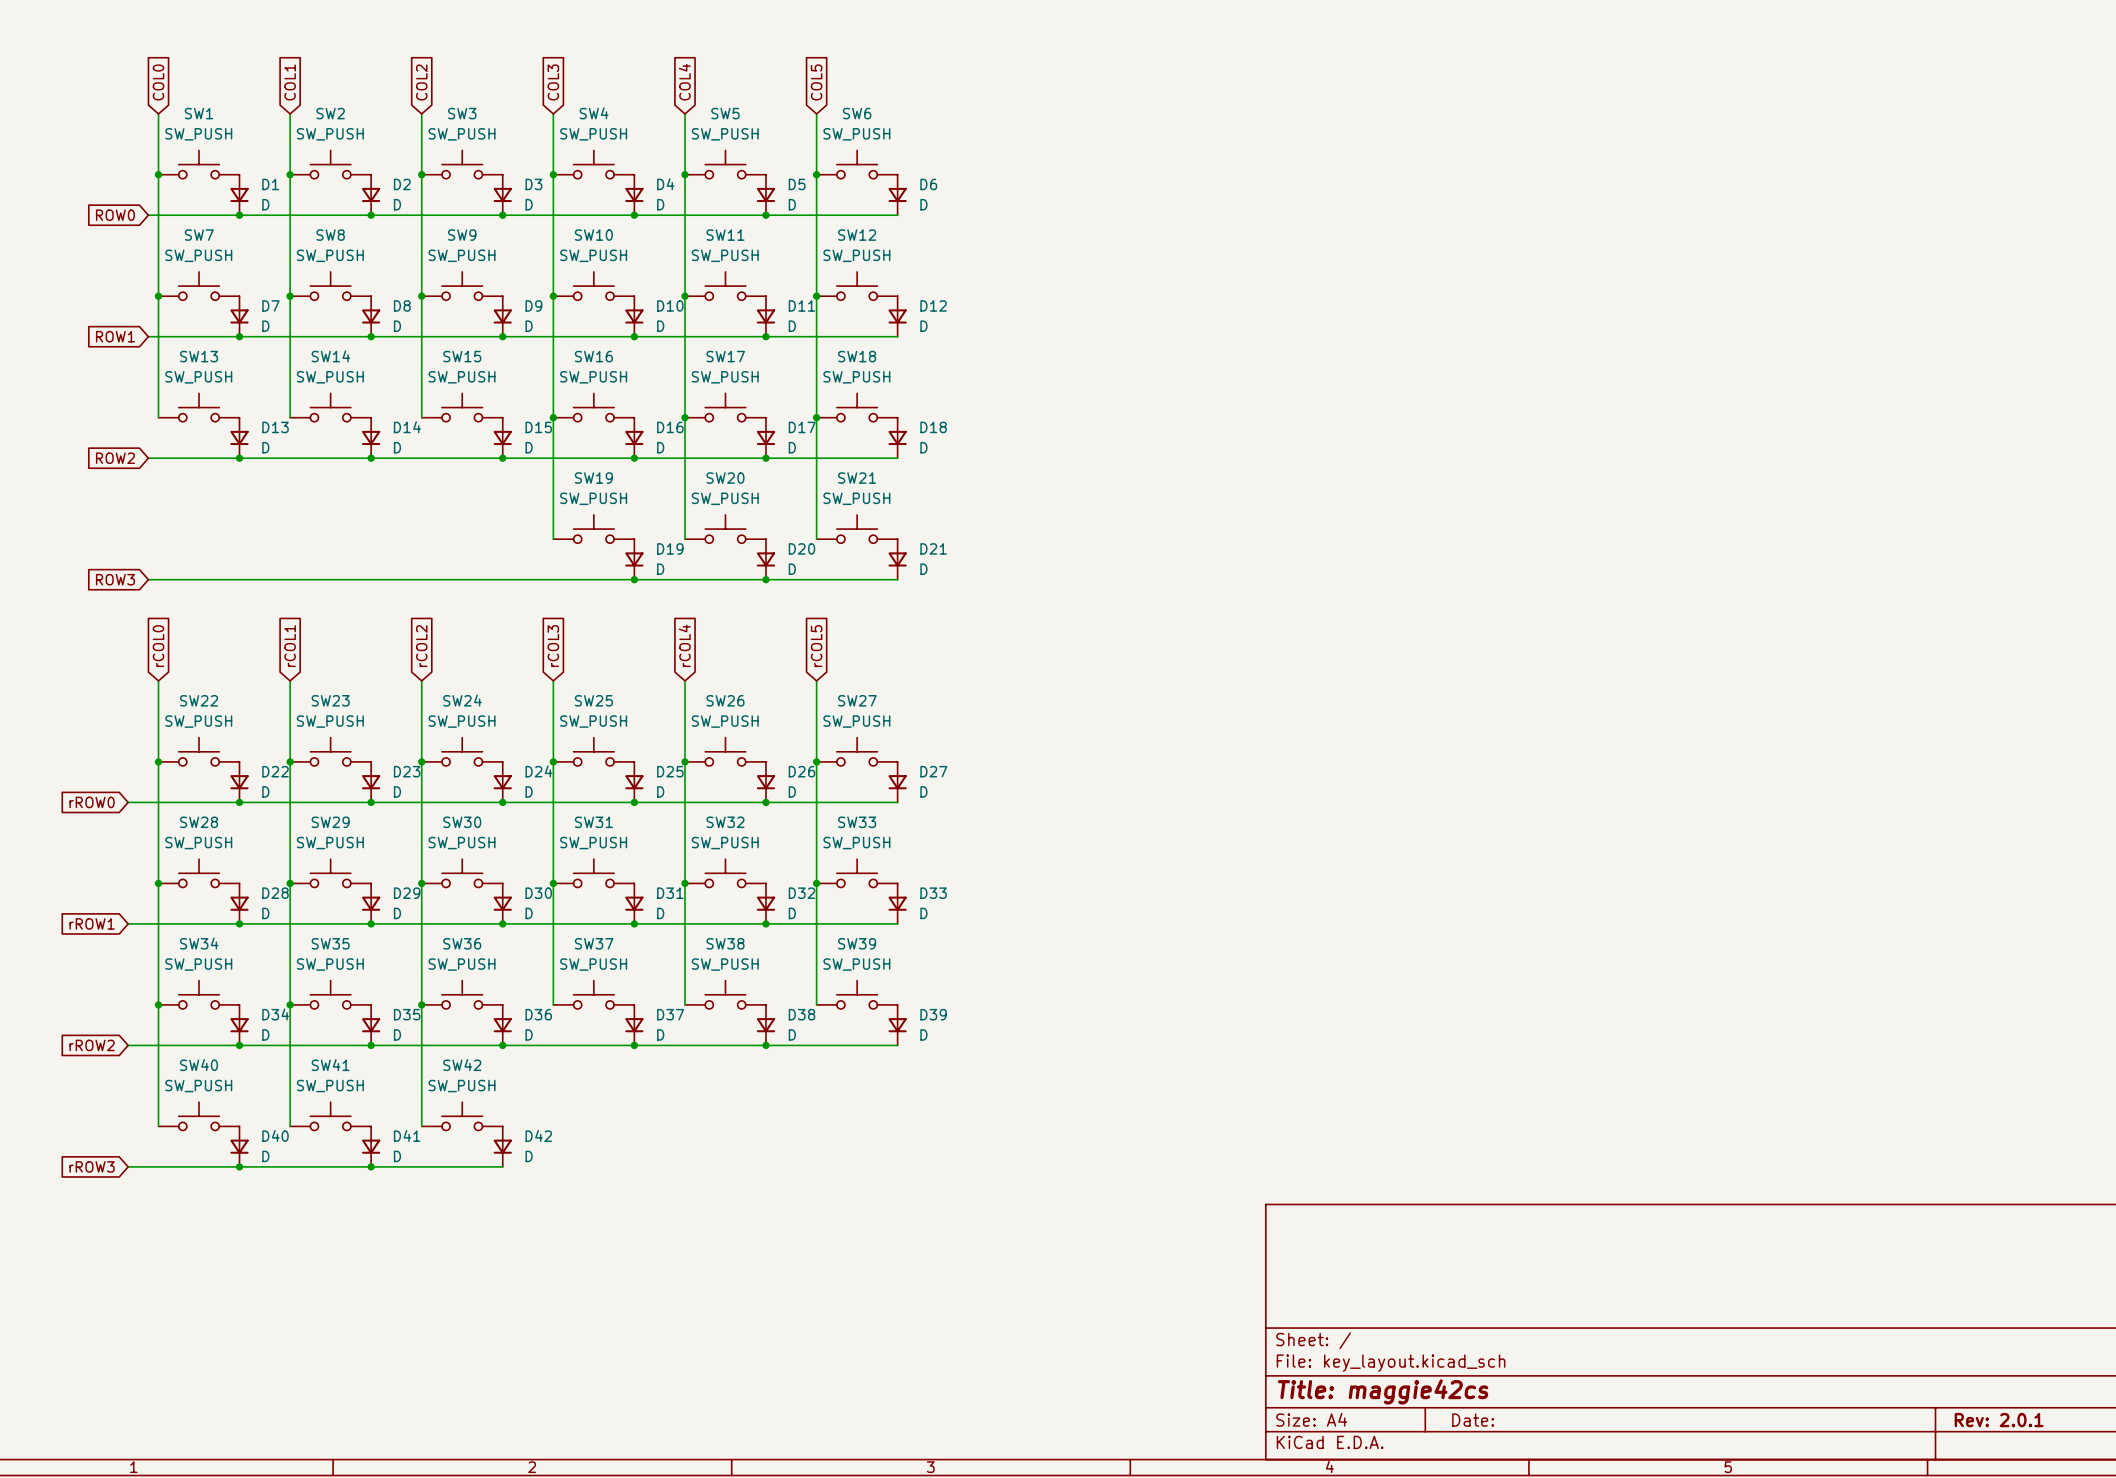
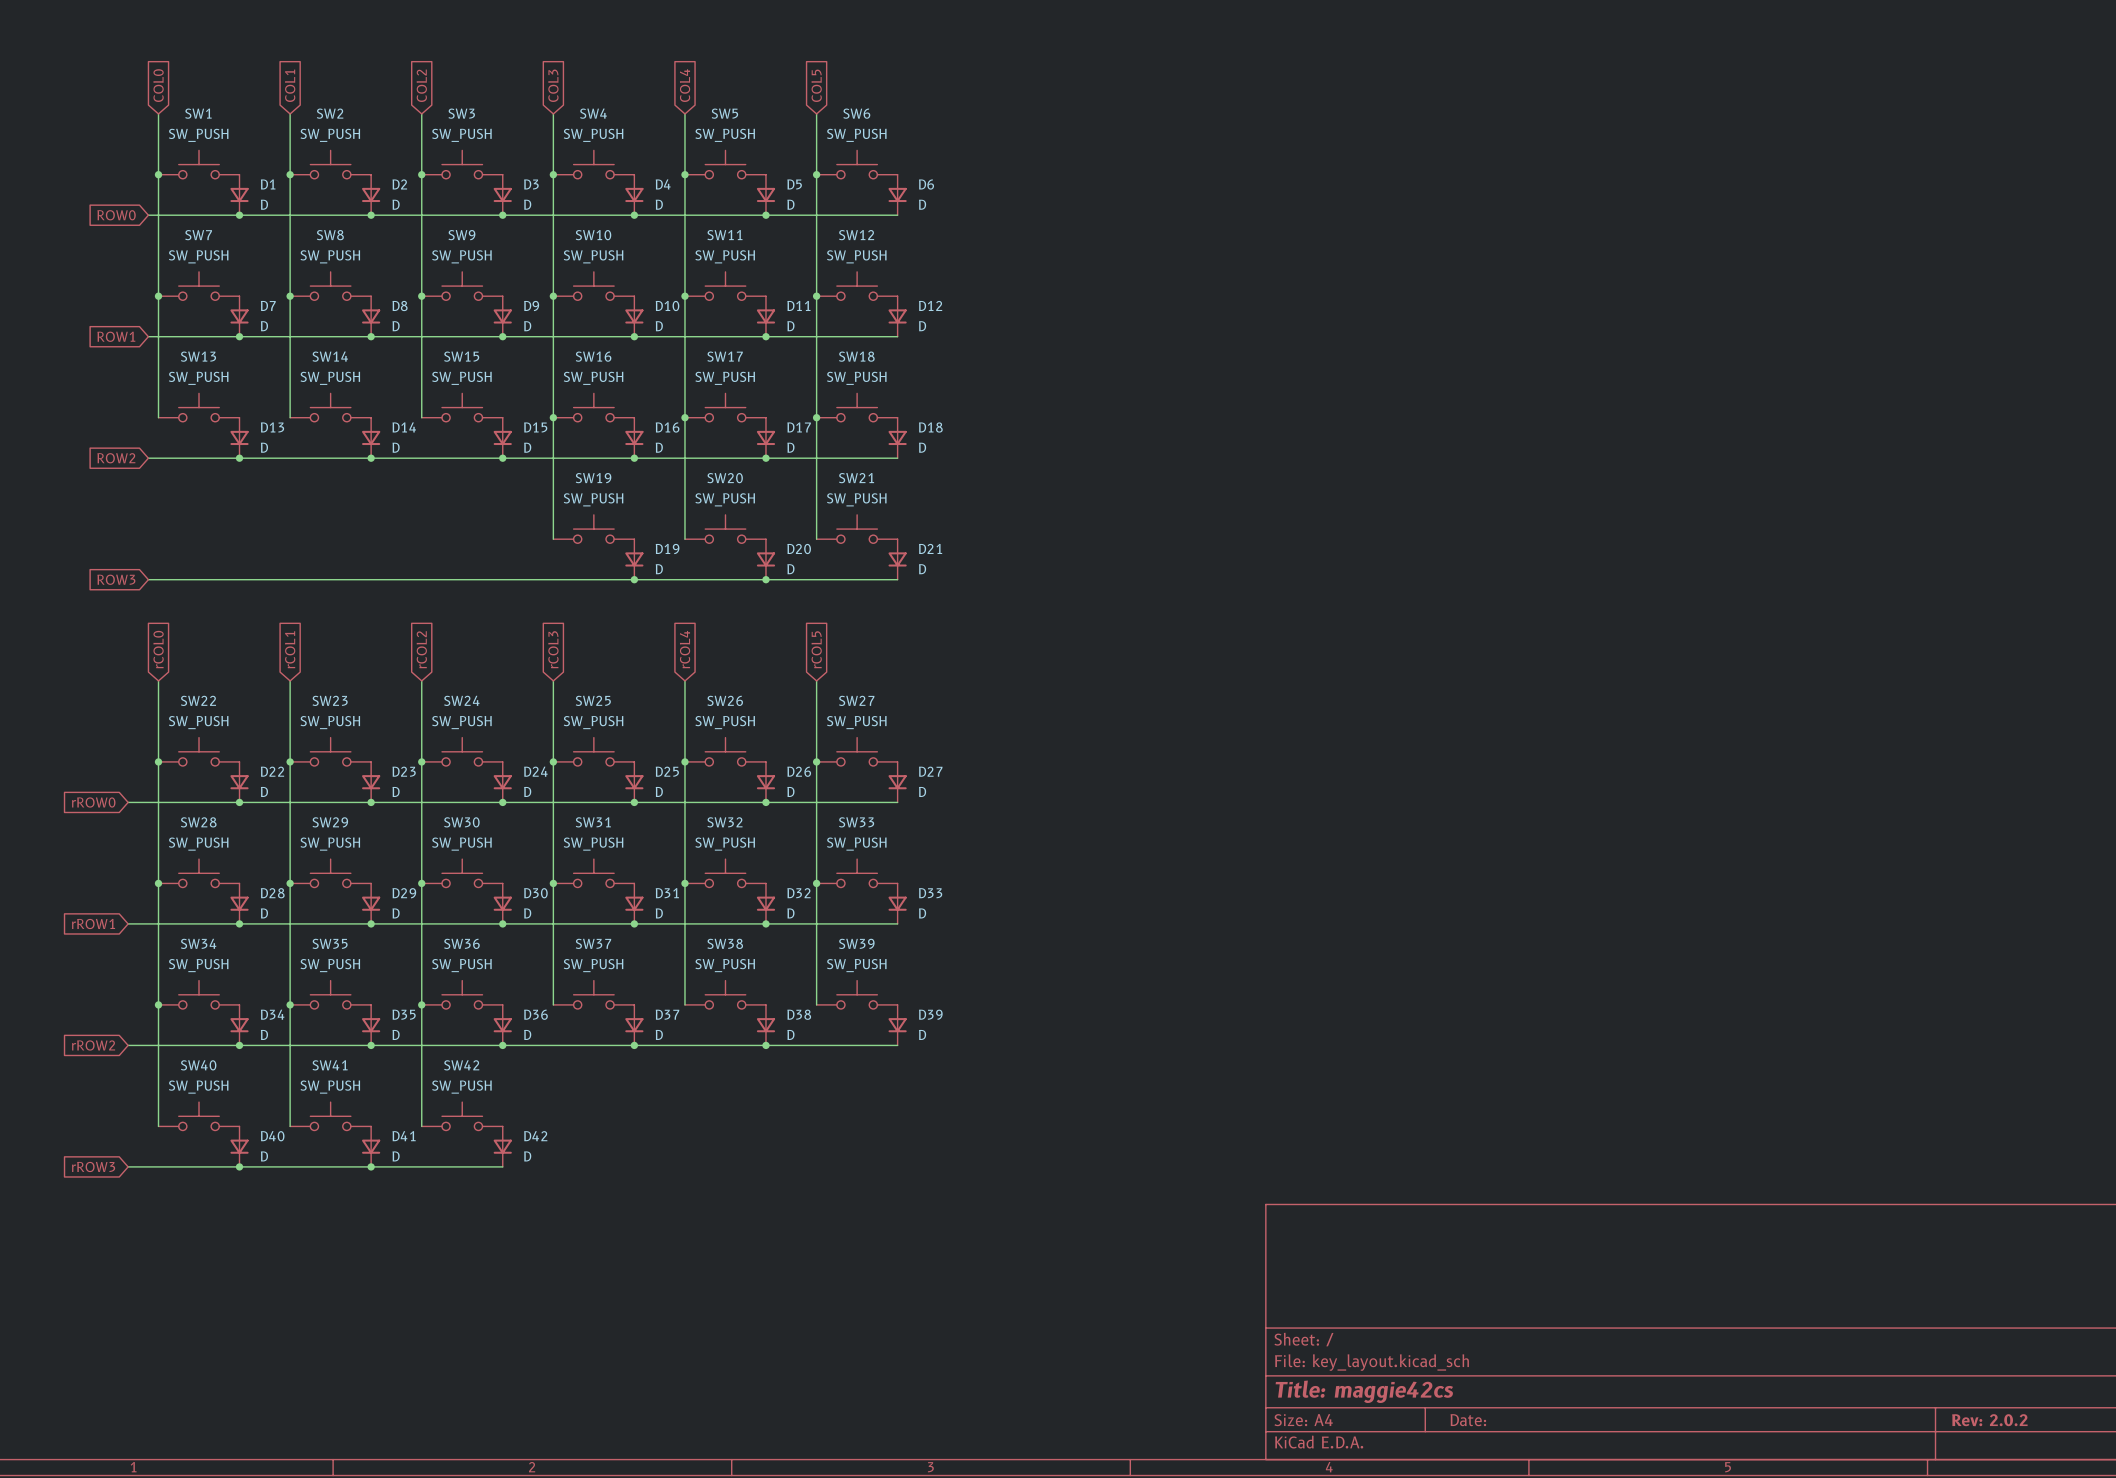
title block: Rev: 2.0.1 (1999, 1420) -> Rev: 2.0.2 (1989, 1420)

